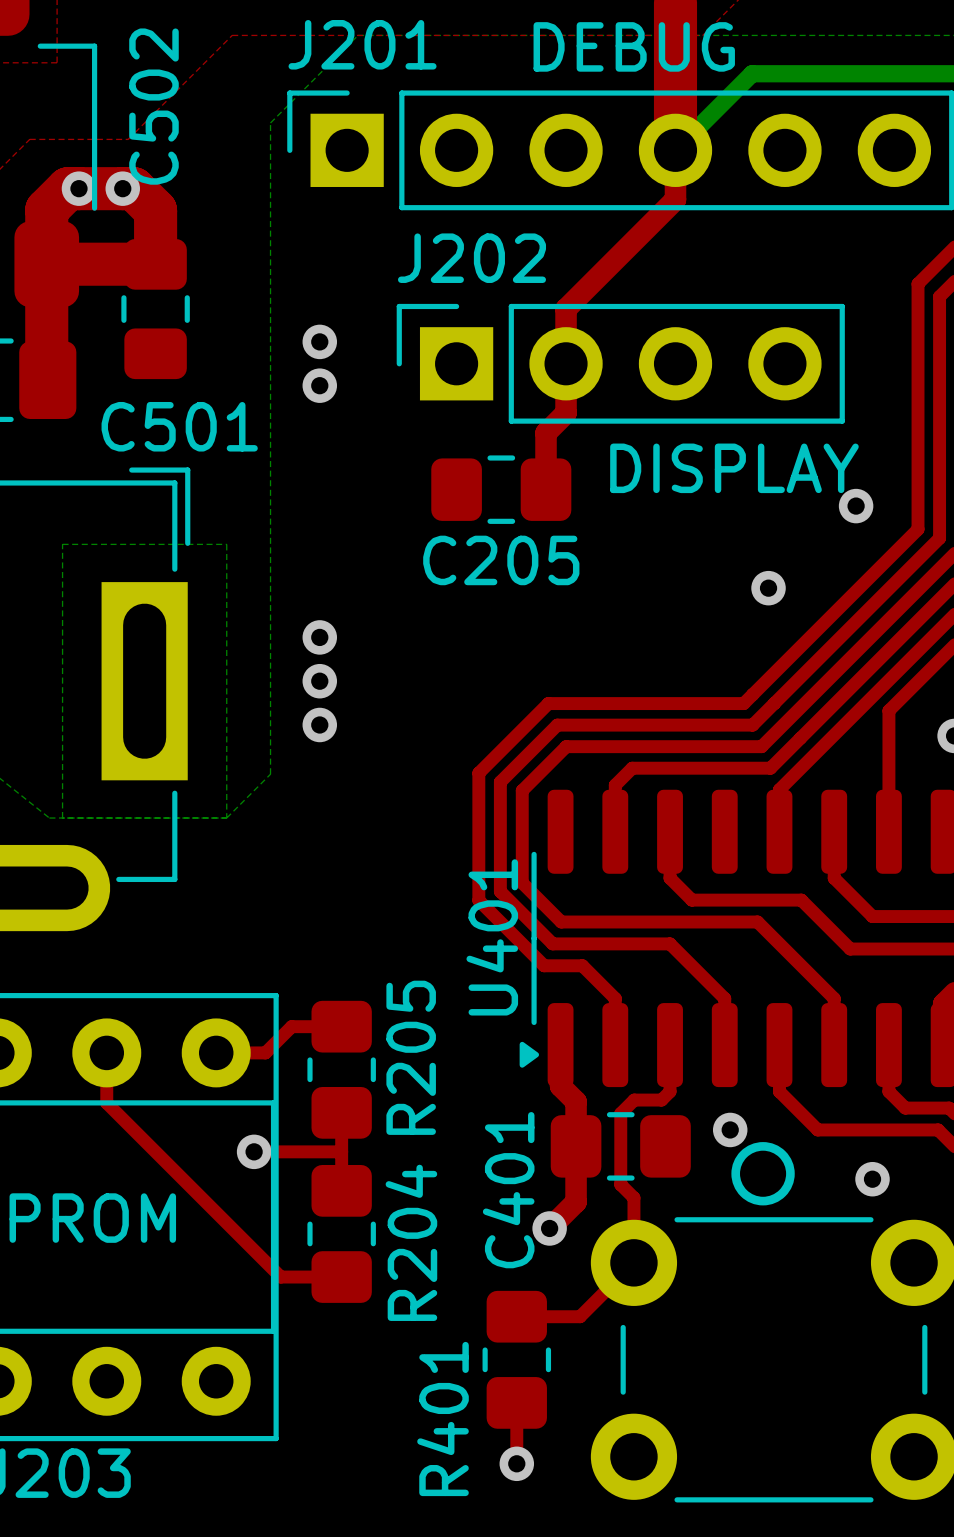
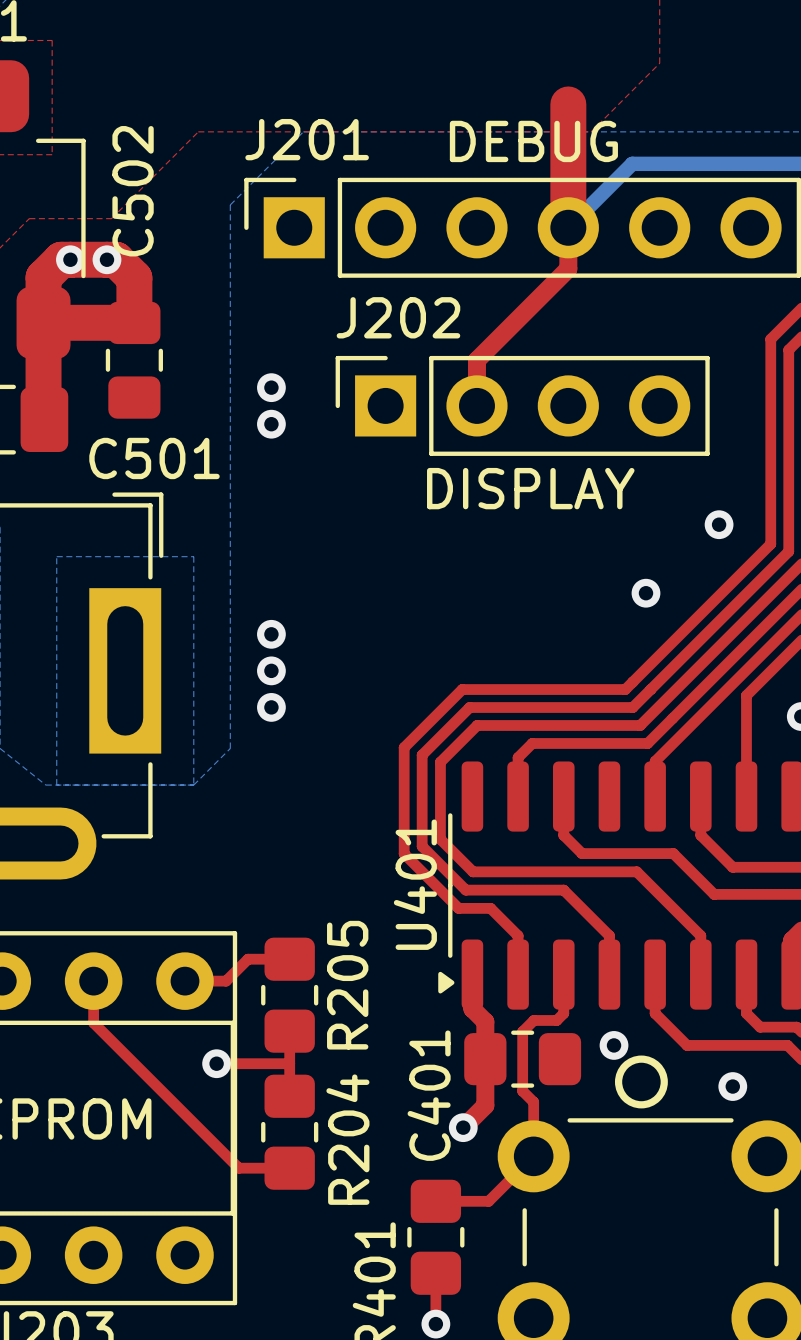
top track: (566, 363) (566, 413) (546, 433) (546, 489) -> none
text position: DISPLAY (734, 468) -> DISPLAY (530, 488)
C205: (501, 489) -> none

